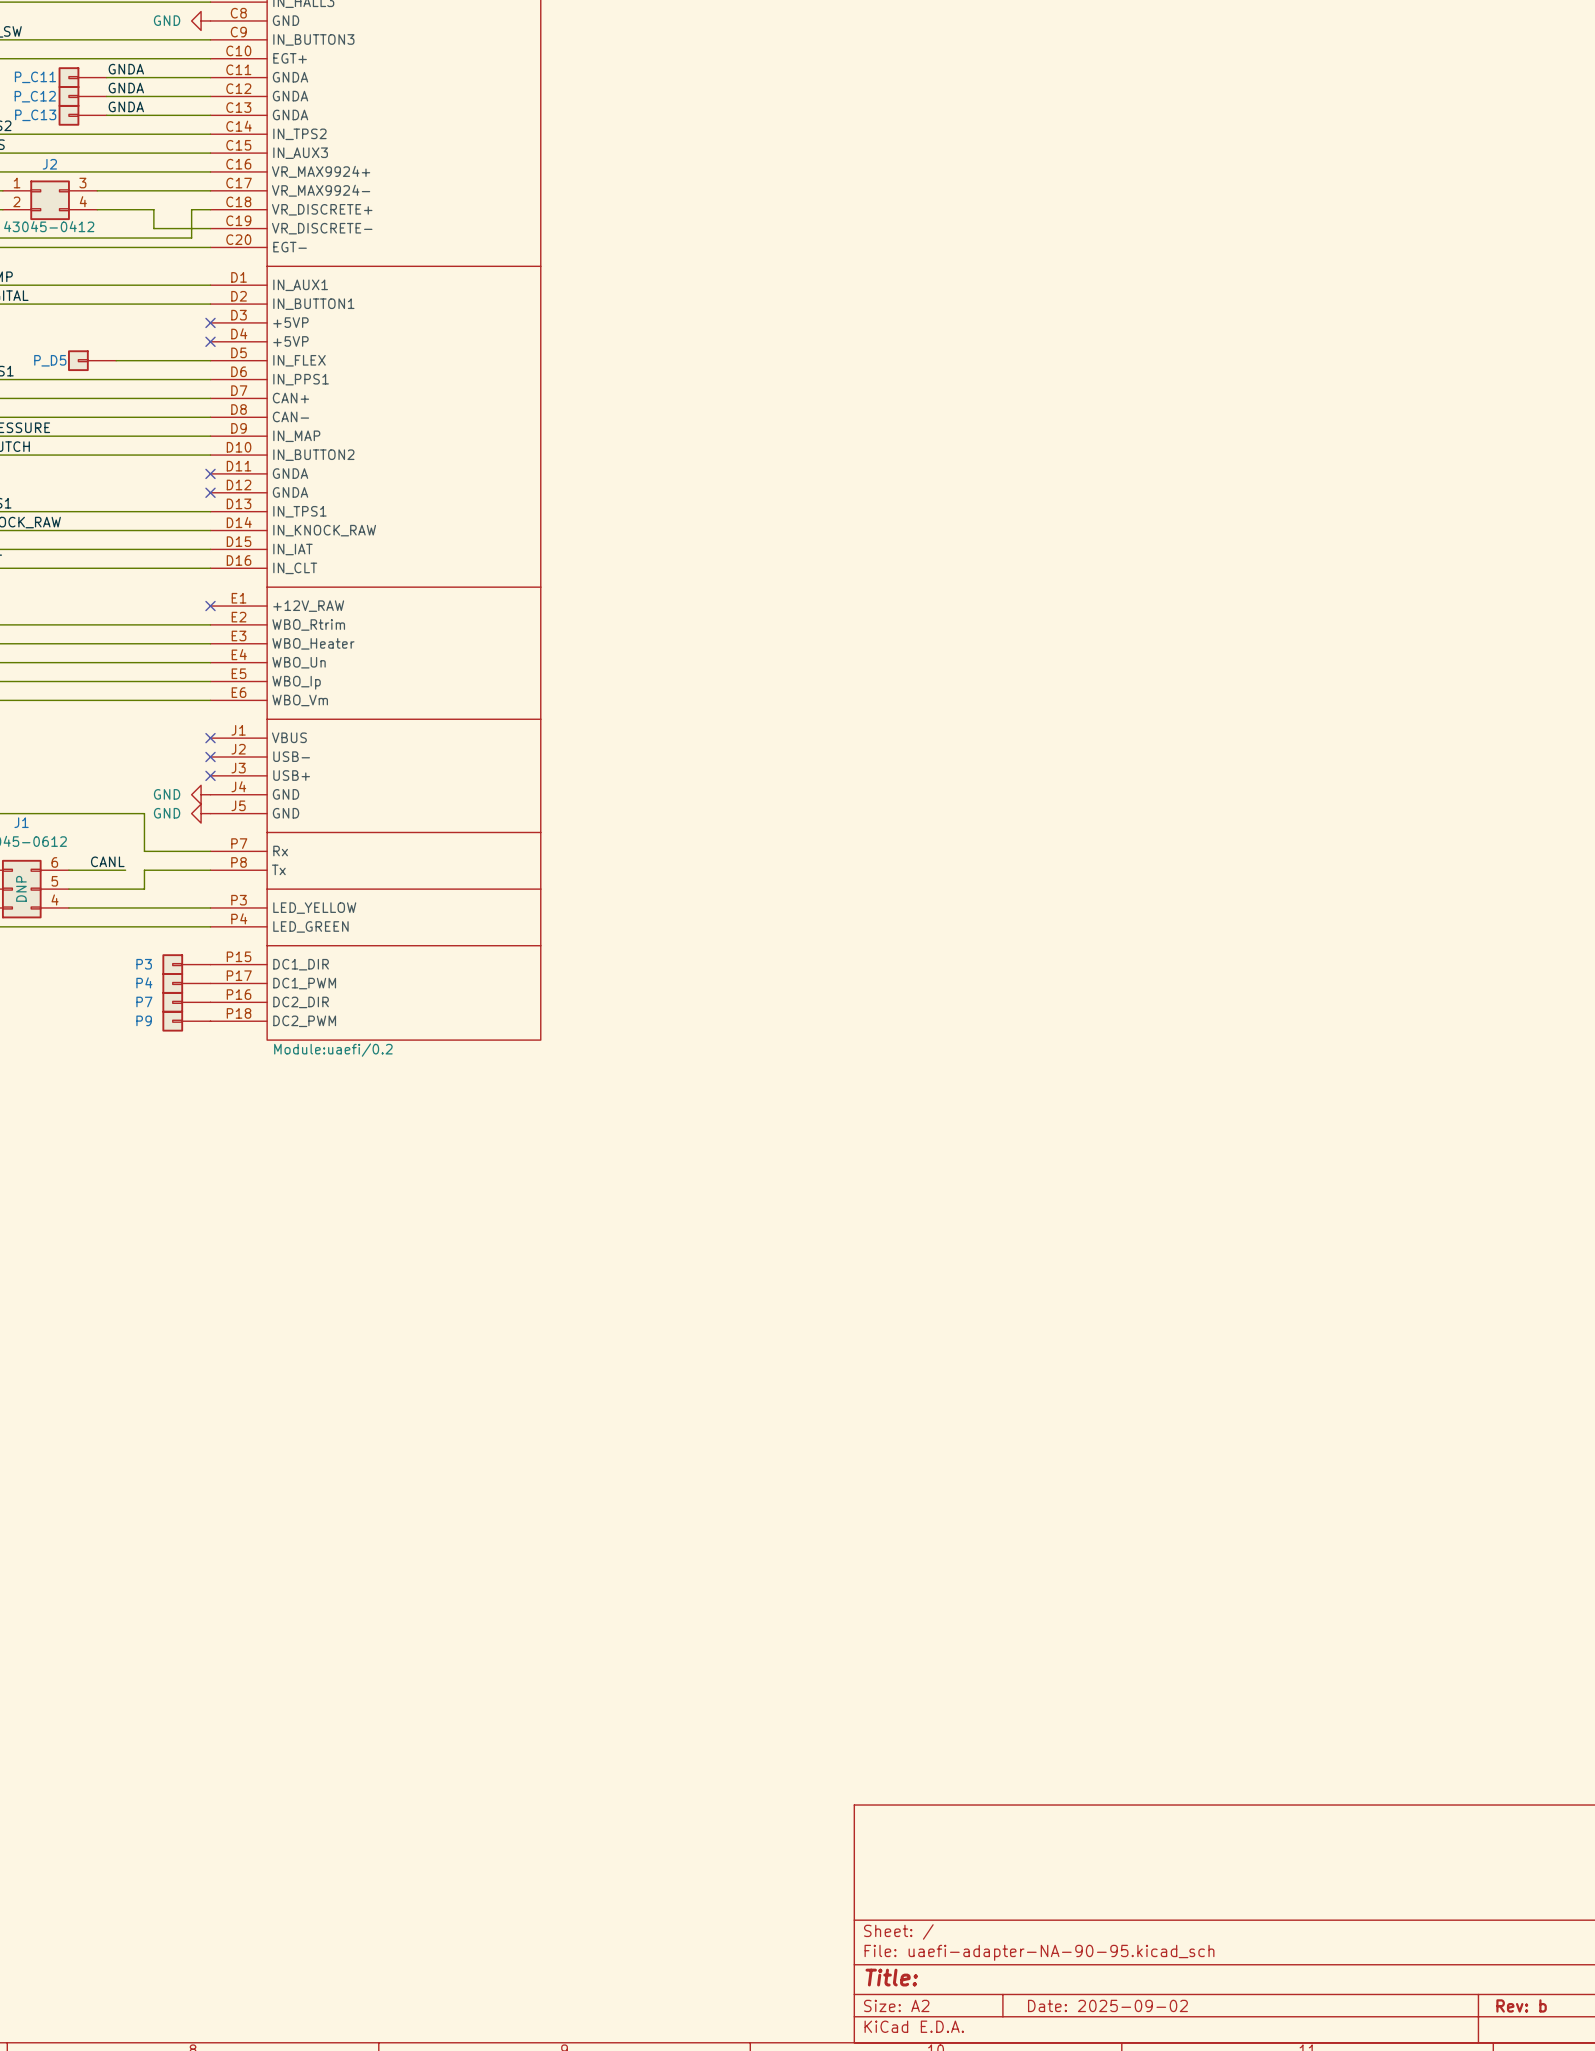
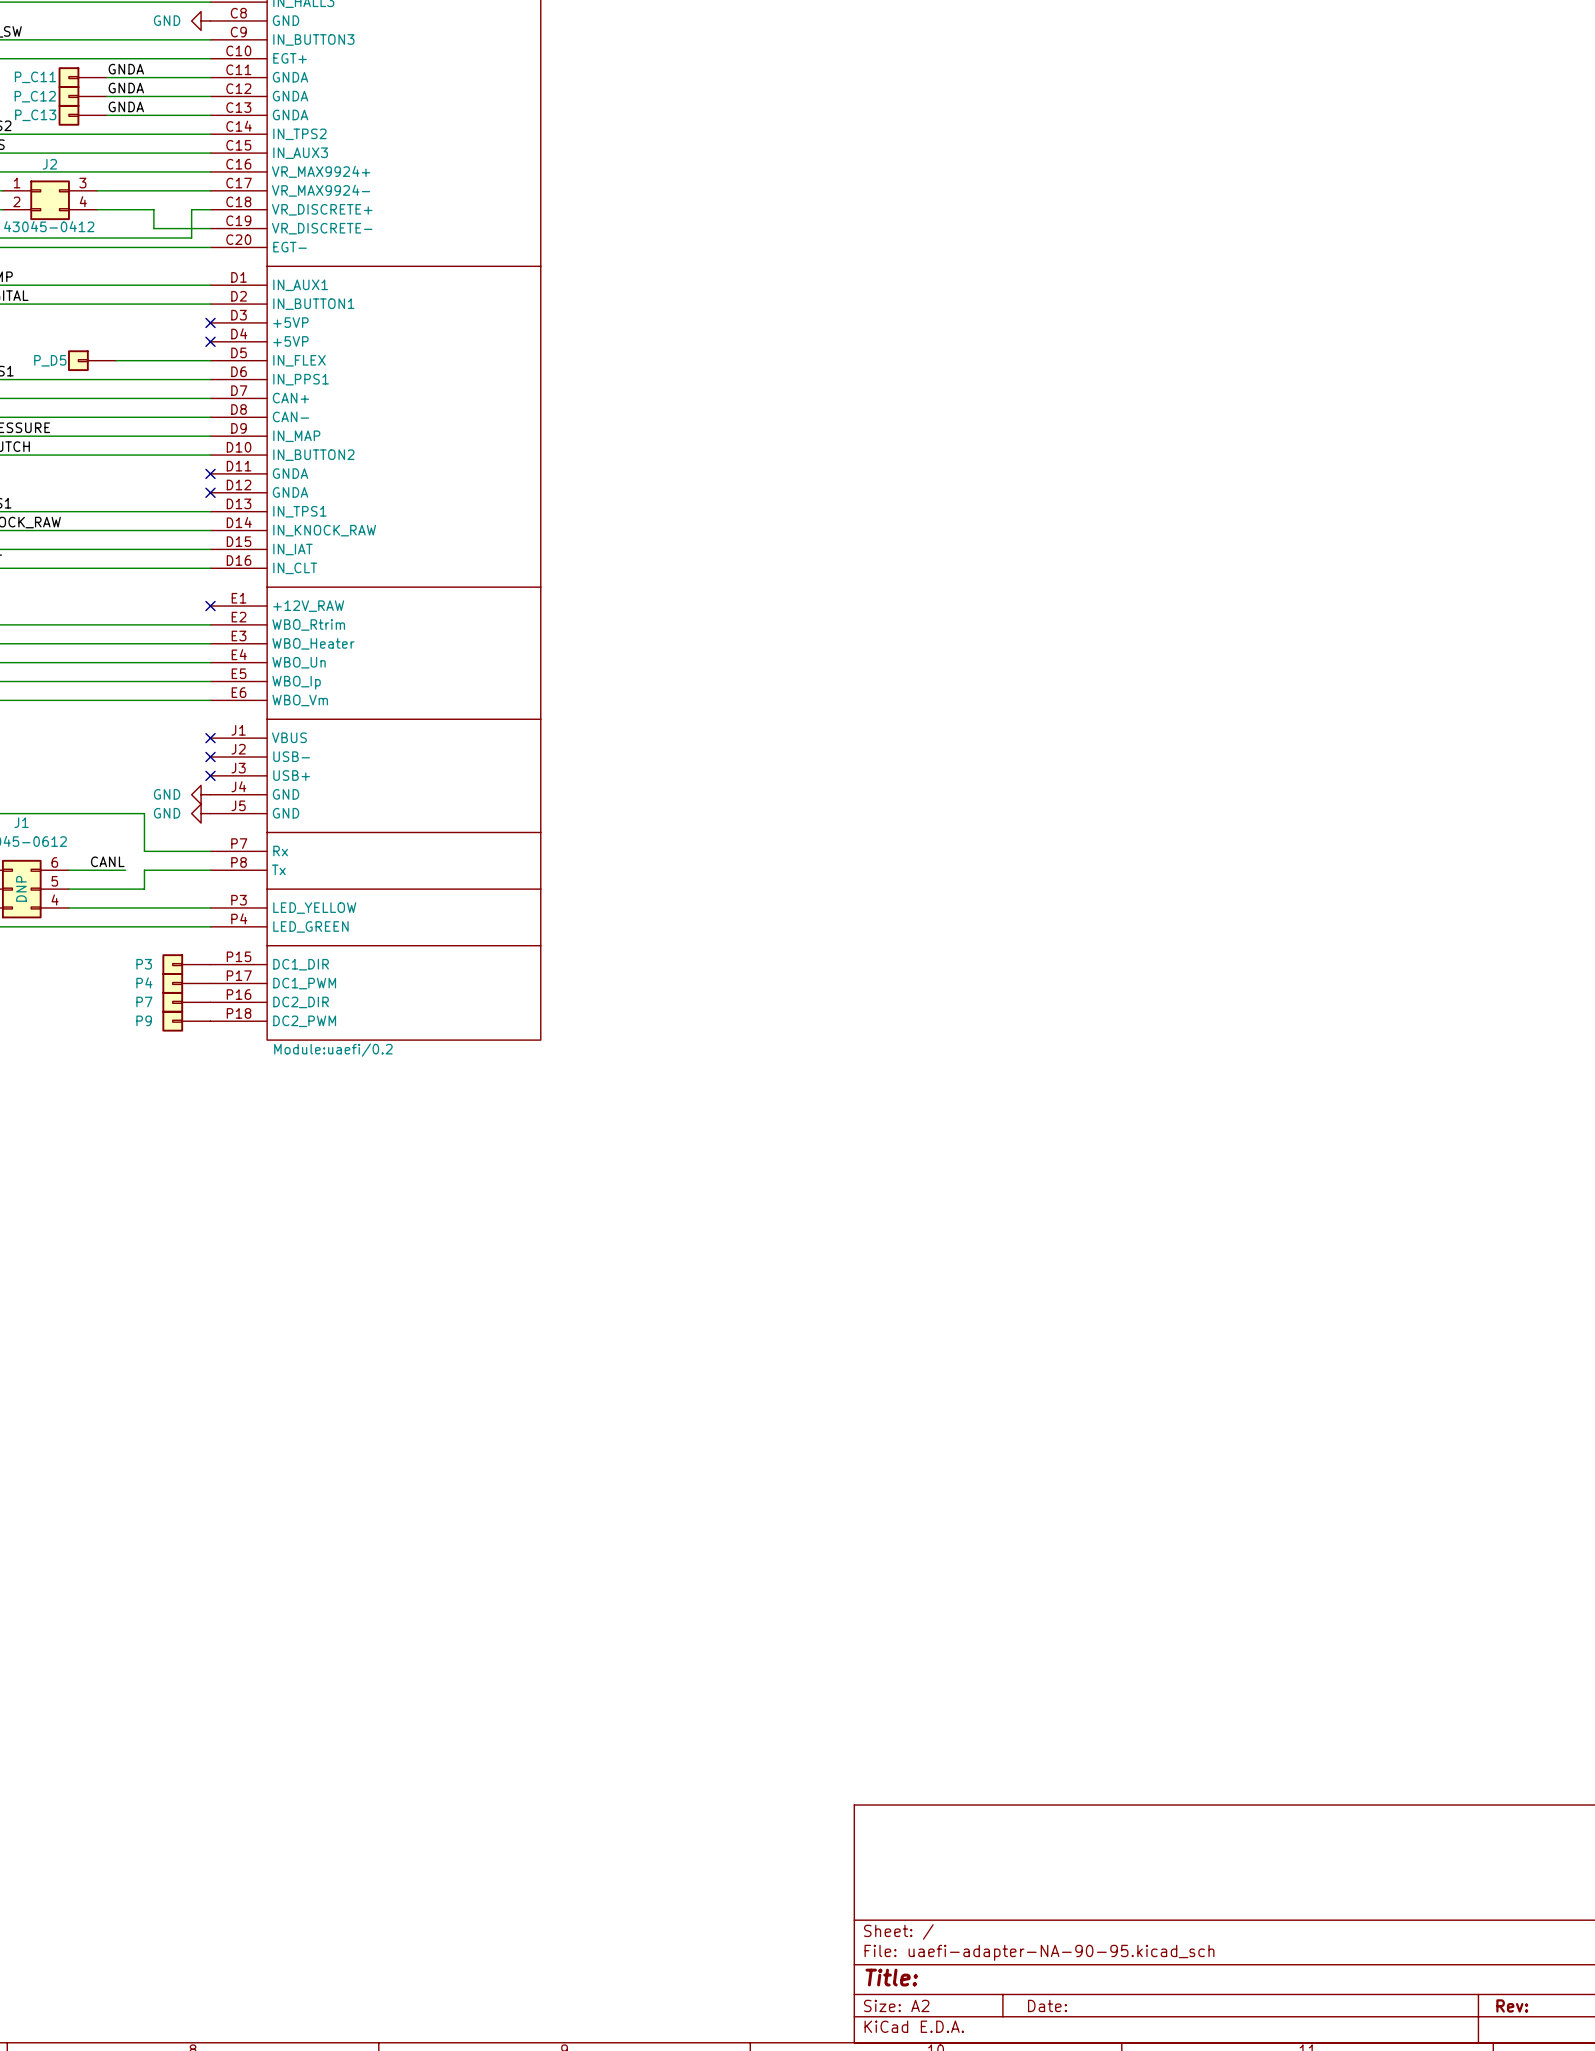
title block: Date: 2025-09-02 (1107, 2005) -> Date: (1047, 2005)
title block: Rev: b (1521, 2005) -> Rev: (1512, 2005)

